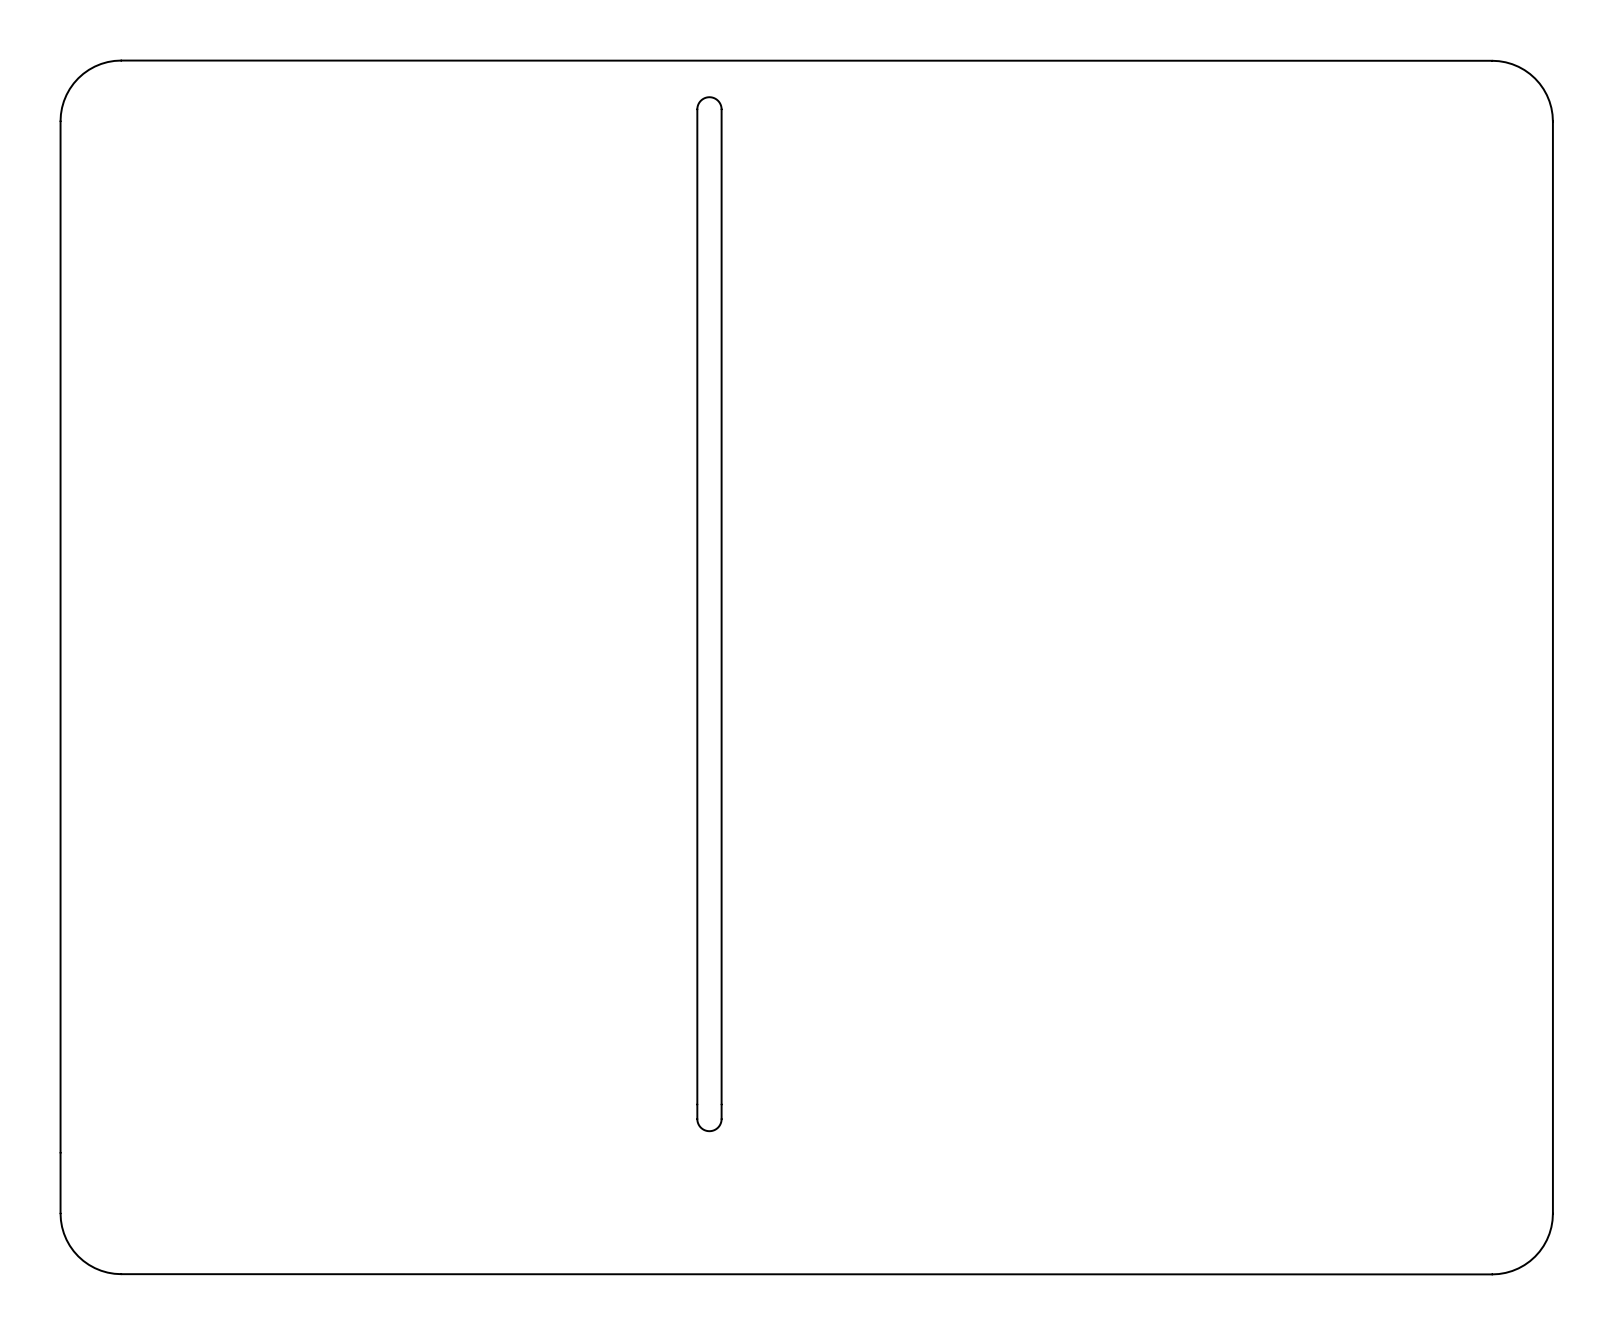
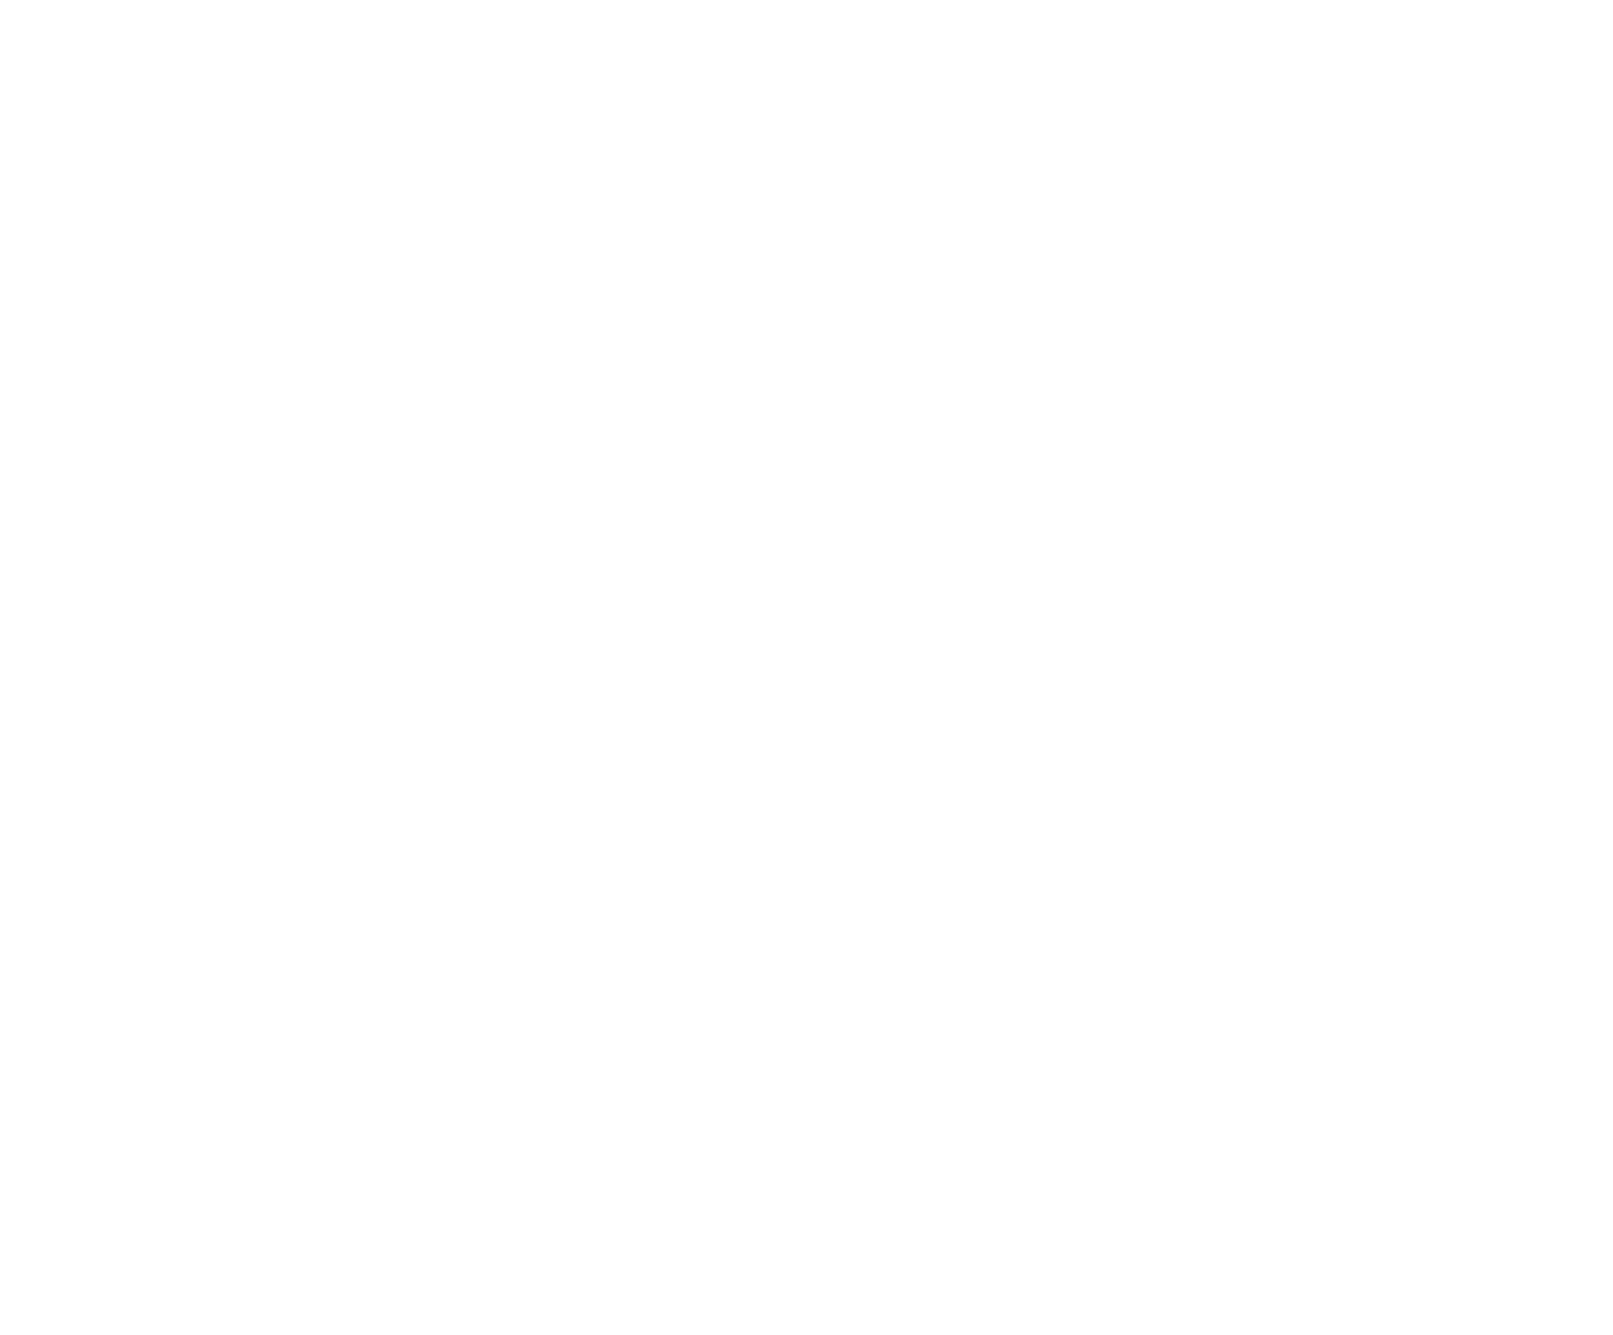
board edge: (121, 60) (1492, 60) (1512, 64) (1530, 74) (1539, 83) (1546, 95) (1551, 107) (1552, 121) (1552, 1213) (1549, 1233) (1539, 1251) (1530, 1261) (1518, 1268) (1505, 1272) (1492, 1274) (121, 1274) (101, 1270) (83, 1260) (73, 1251) (66, 1239) (62, 1226) (60, 1213) (60, 121) (63, 101) (69, 88) (78, 78) (88, 69) (101, 63) (121, 60) -> none
board edge: (697, 109) (697, 1119) (700, 1127) (709, 1131) (718, 1127) (721, 1119) (721, 109) (718, 100) (709, 97) (700, 100) (697, 109) -> none

